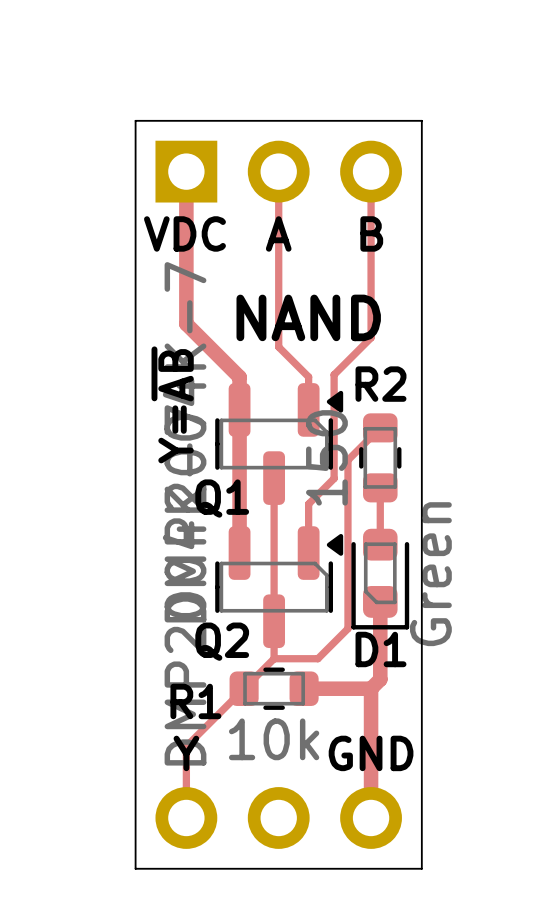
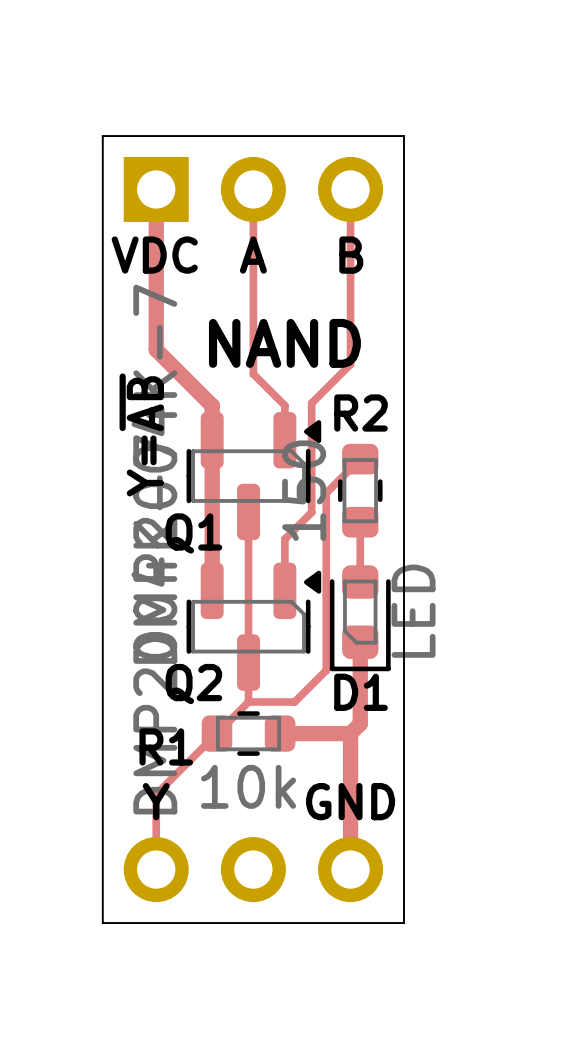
D1 value: Green (430, 574) -> LED (413, 611)

